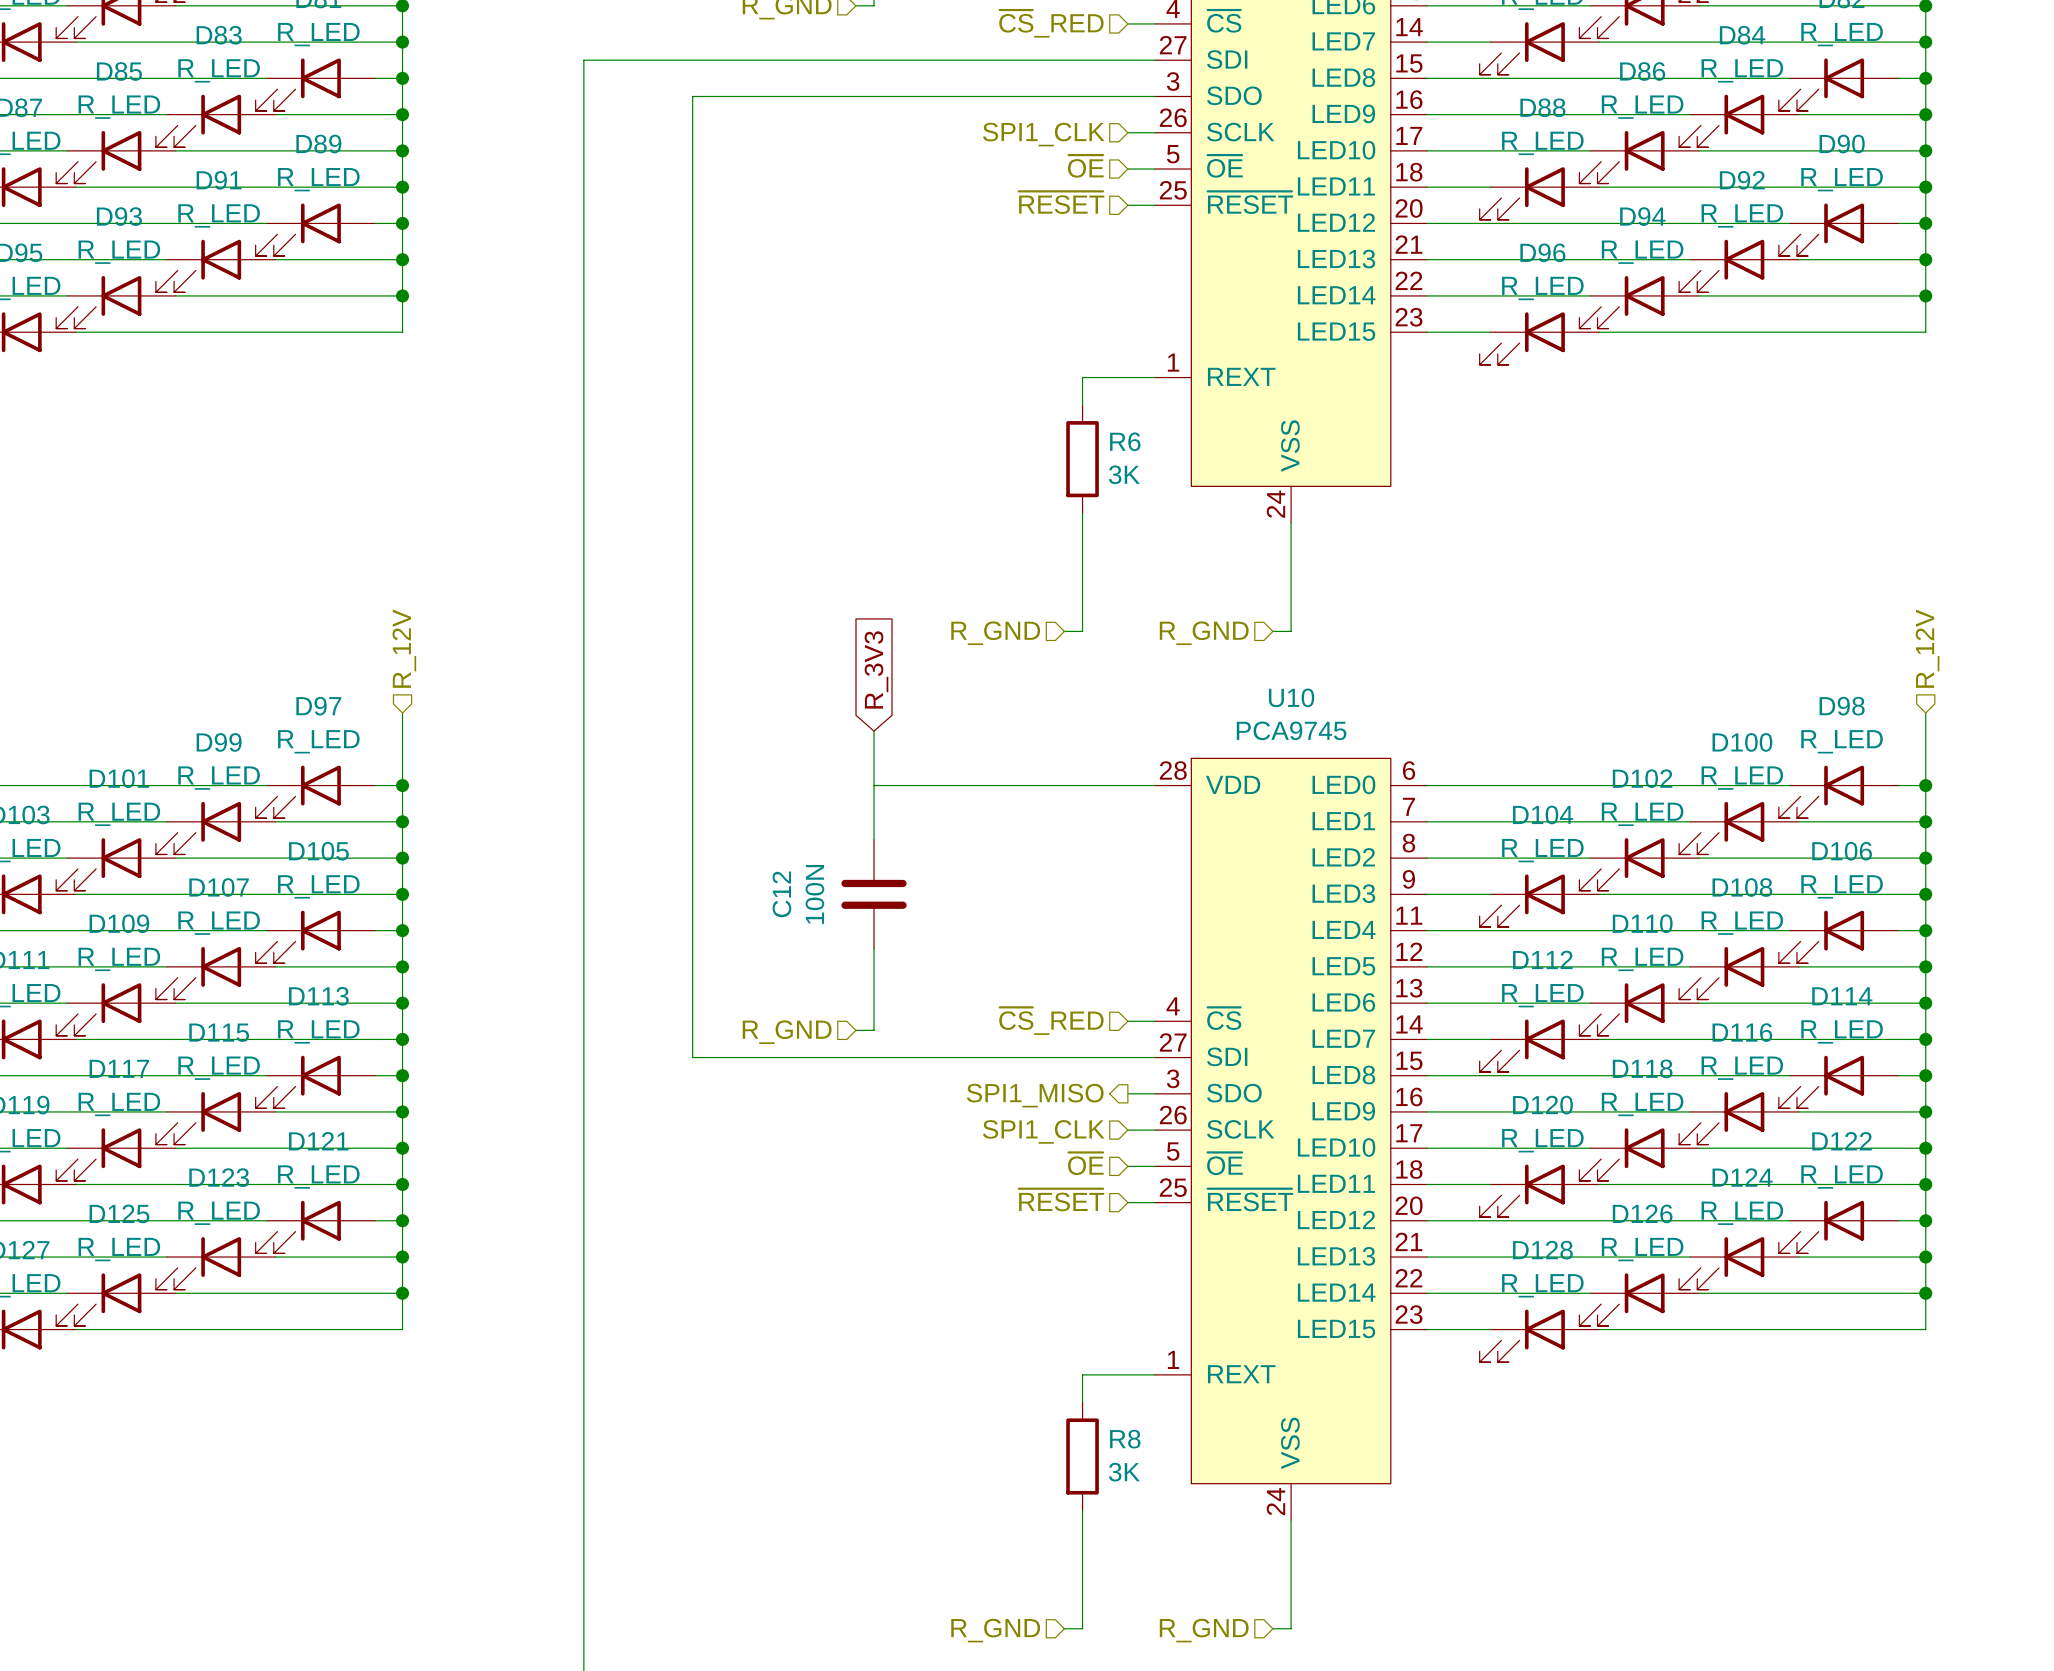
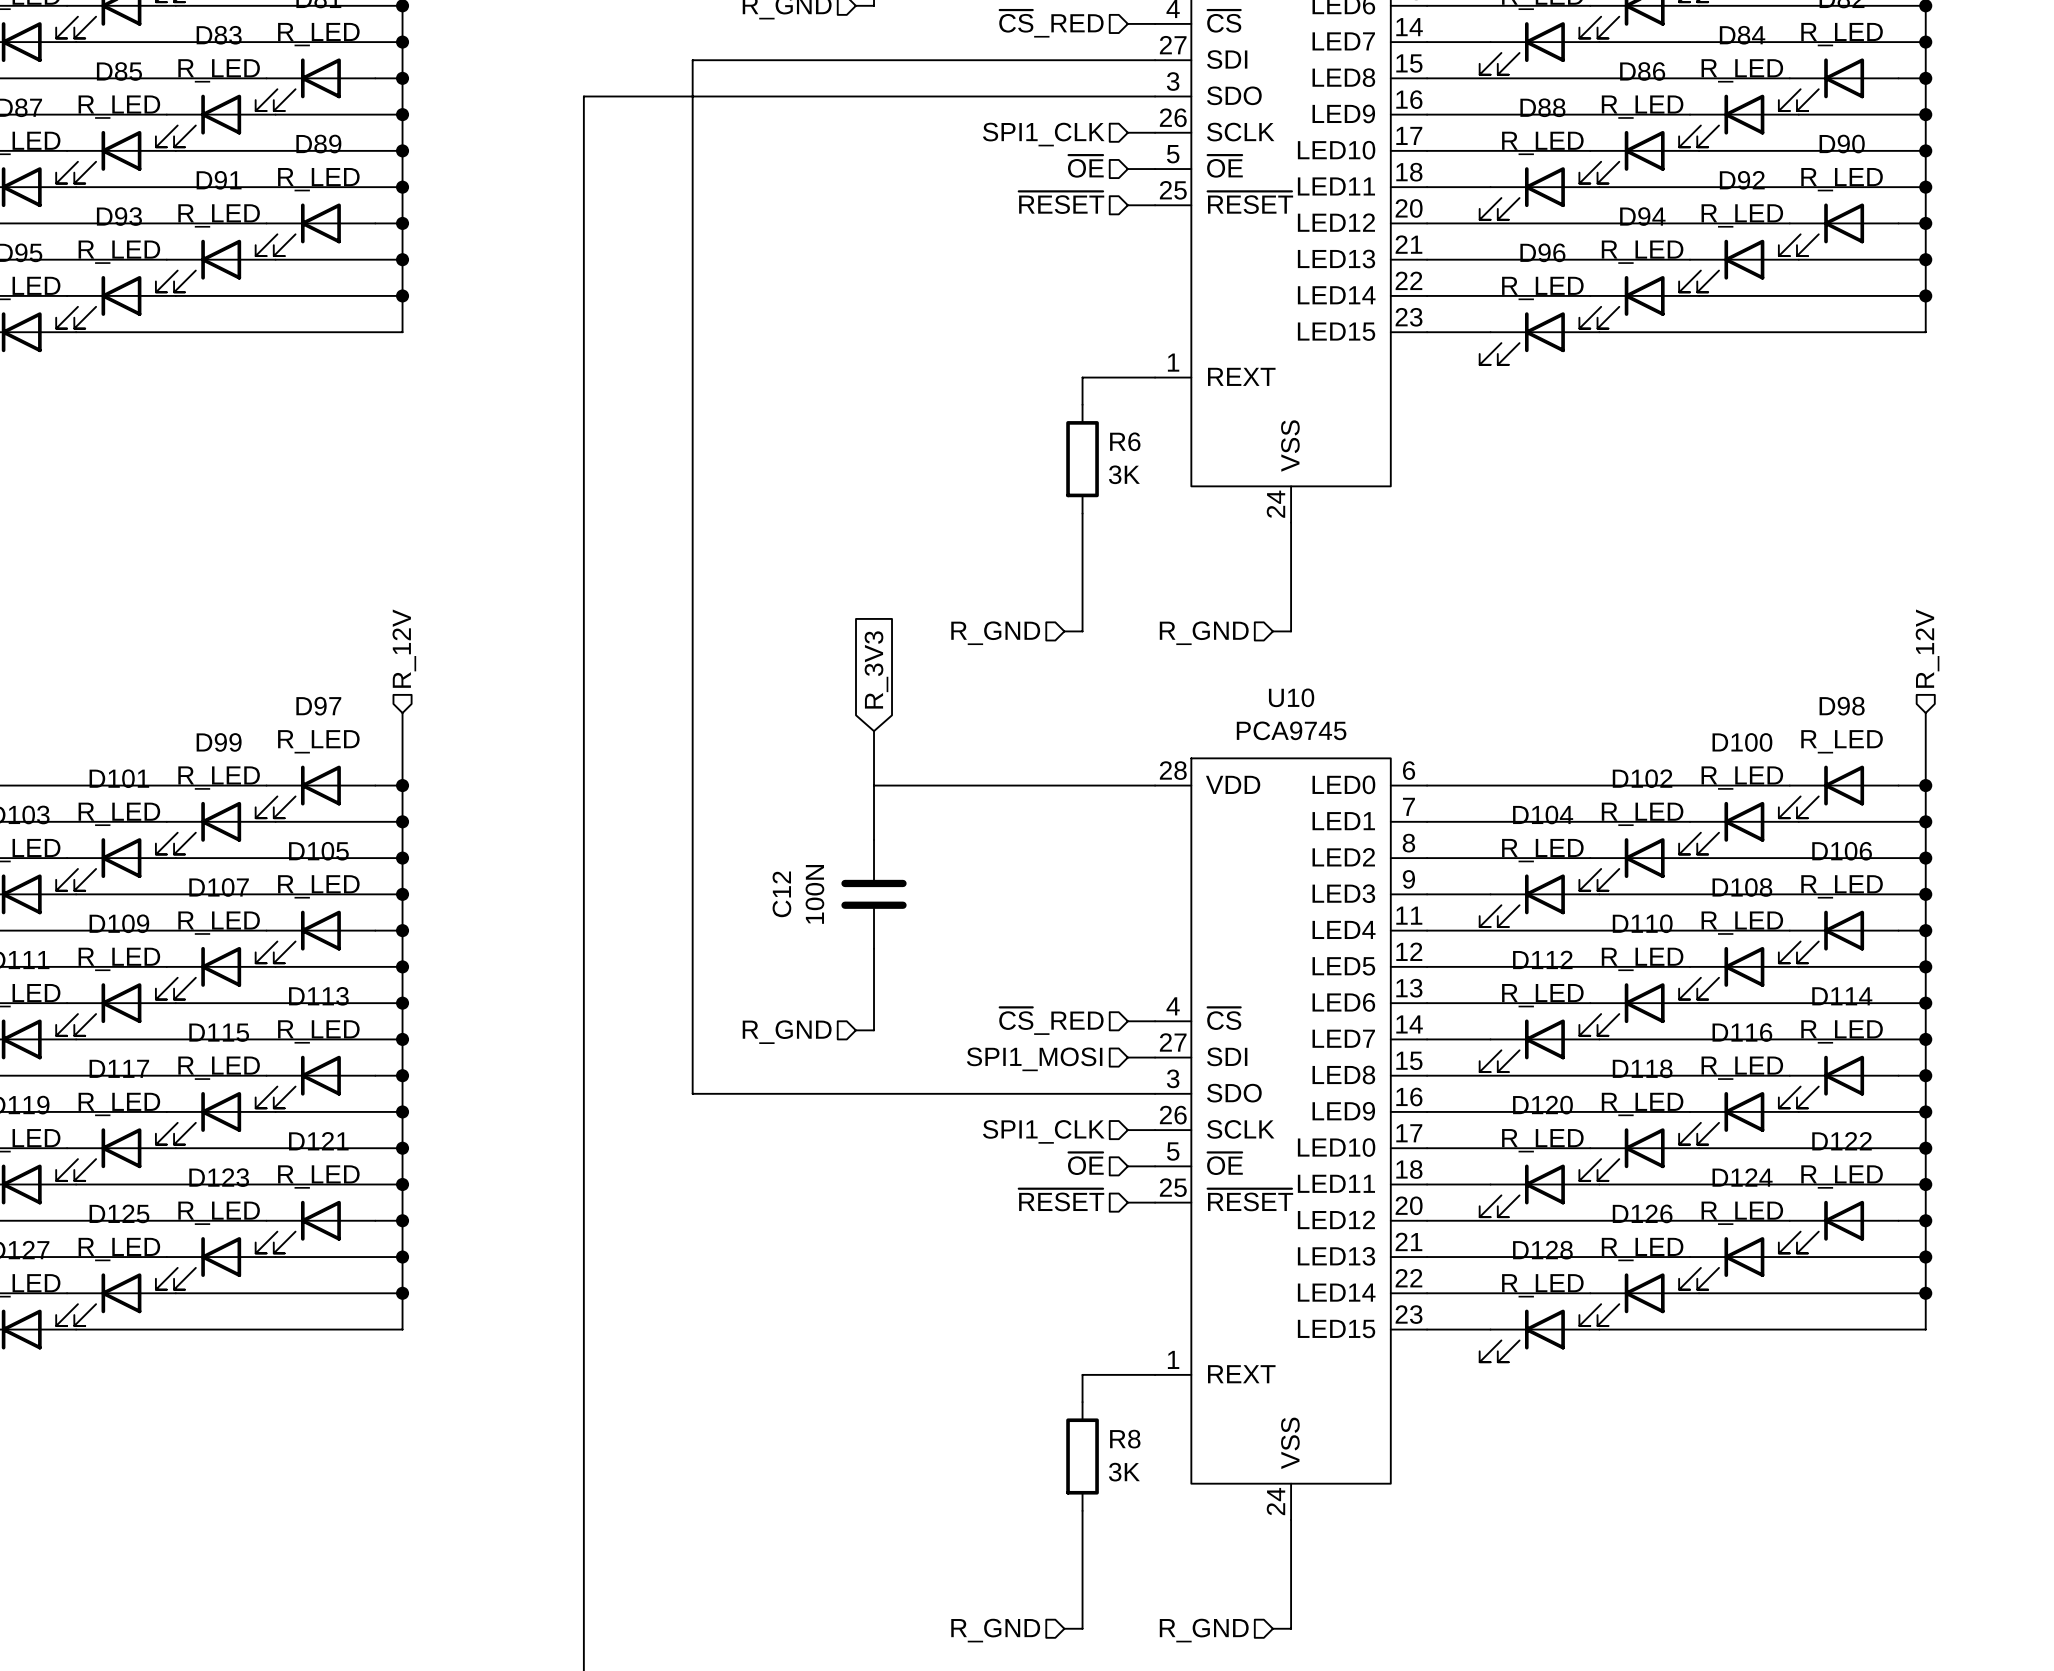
wire: (692, 60) (583, 60) (583, 96) -> (692, 60) (692, 96) (583, 96)
wire: (692, 1057) (1127, 1057) -> (692, 1057) (692, 1093) (1127, 1093)
hierarchical label shape: output (1035, 1095) -> input (1034, 1059)
hierarchical label: SPI1_MISO (1035, 1095) -> SPI1_MOSI (1034, 1059)

